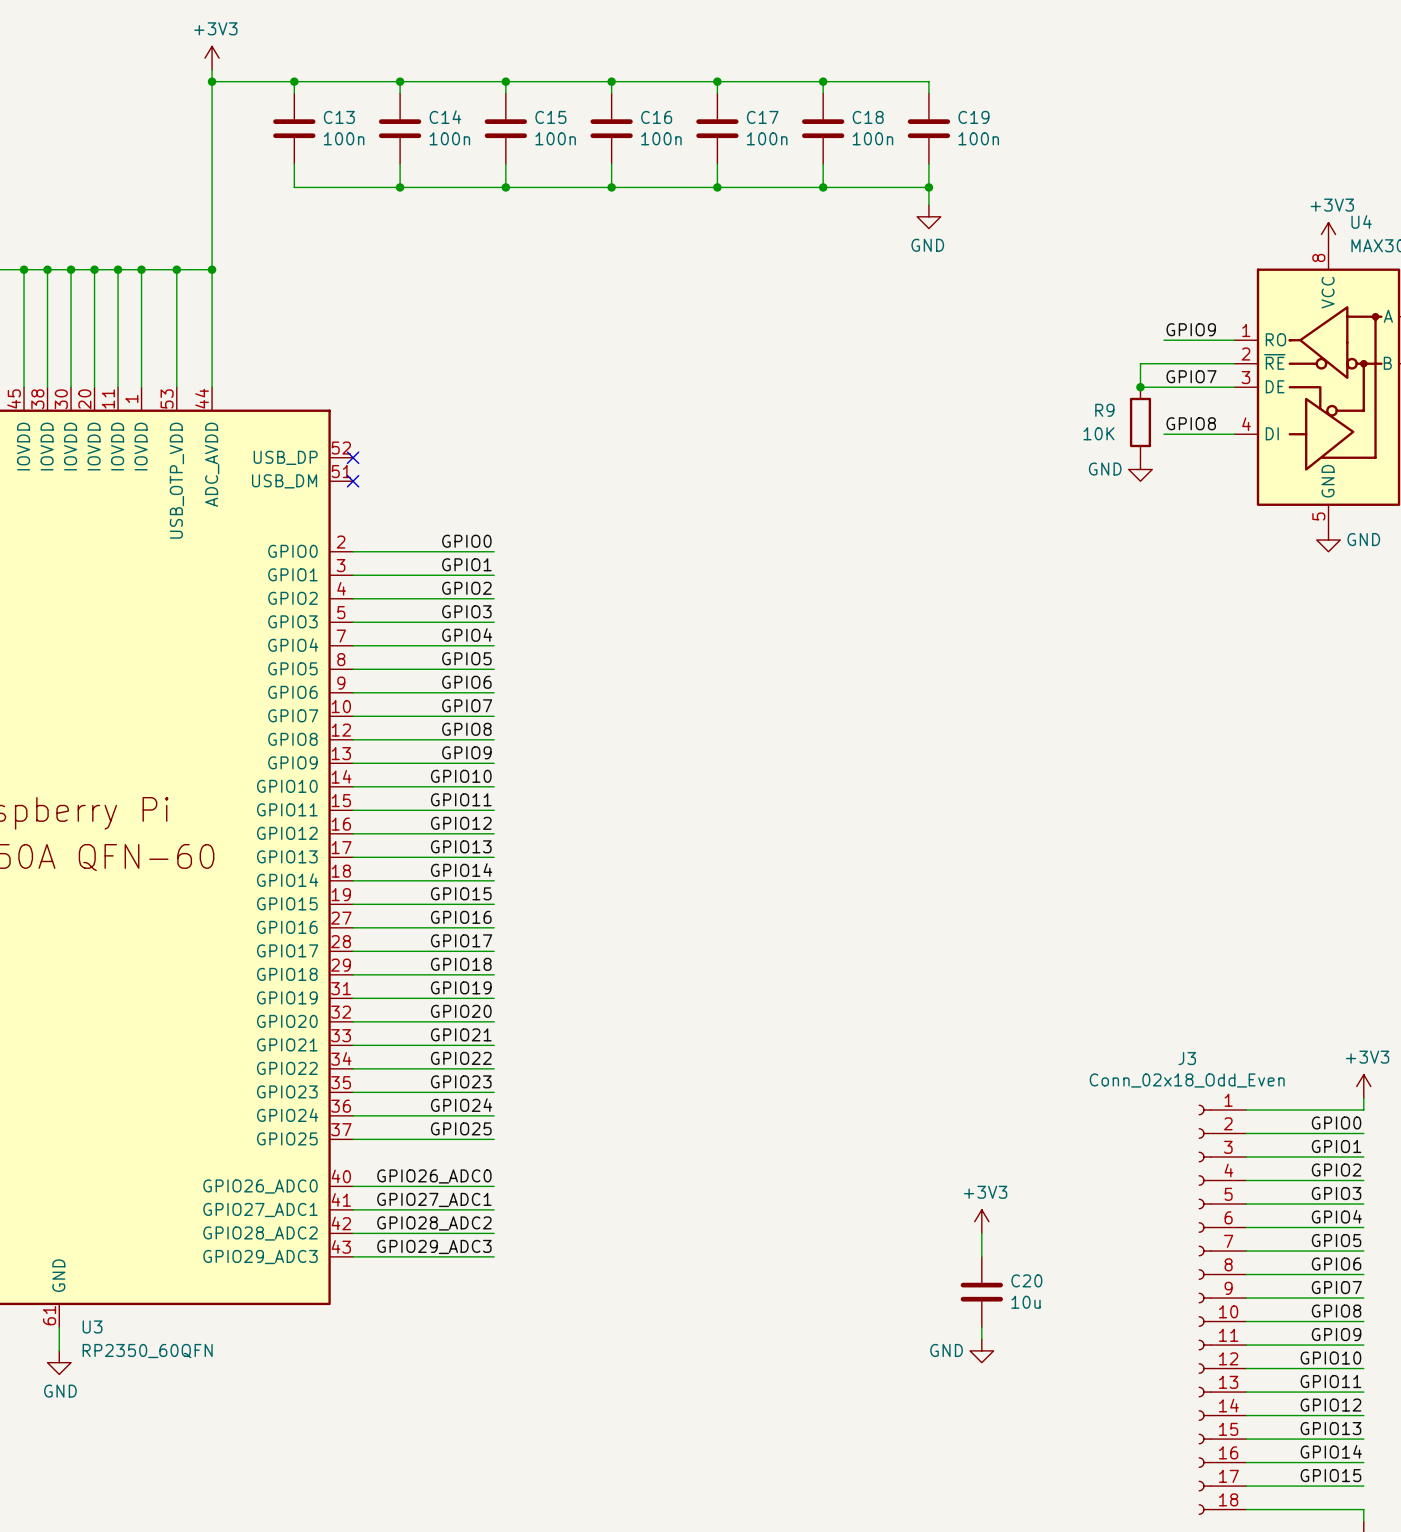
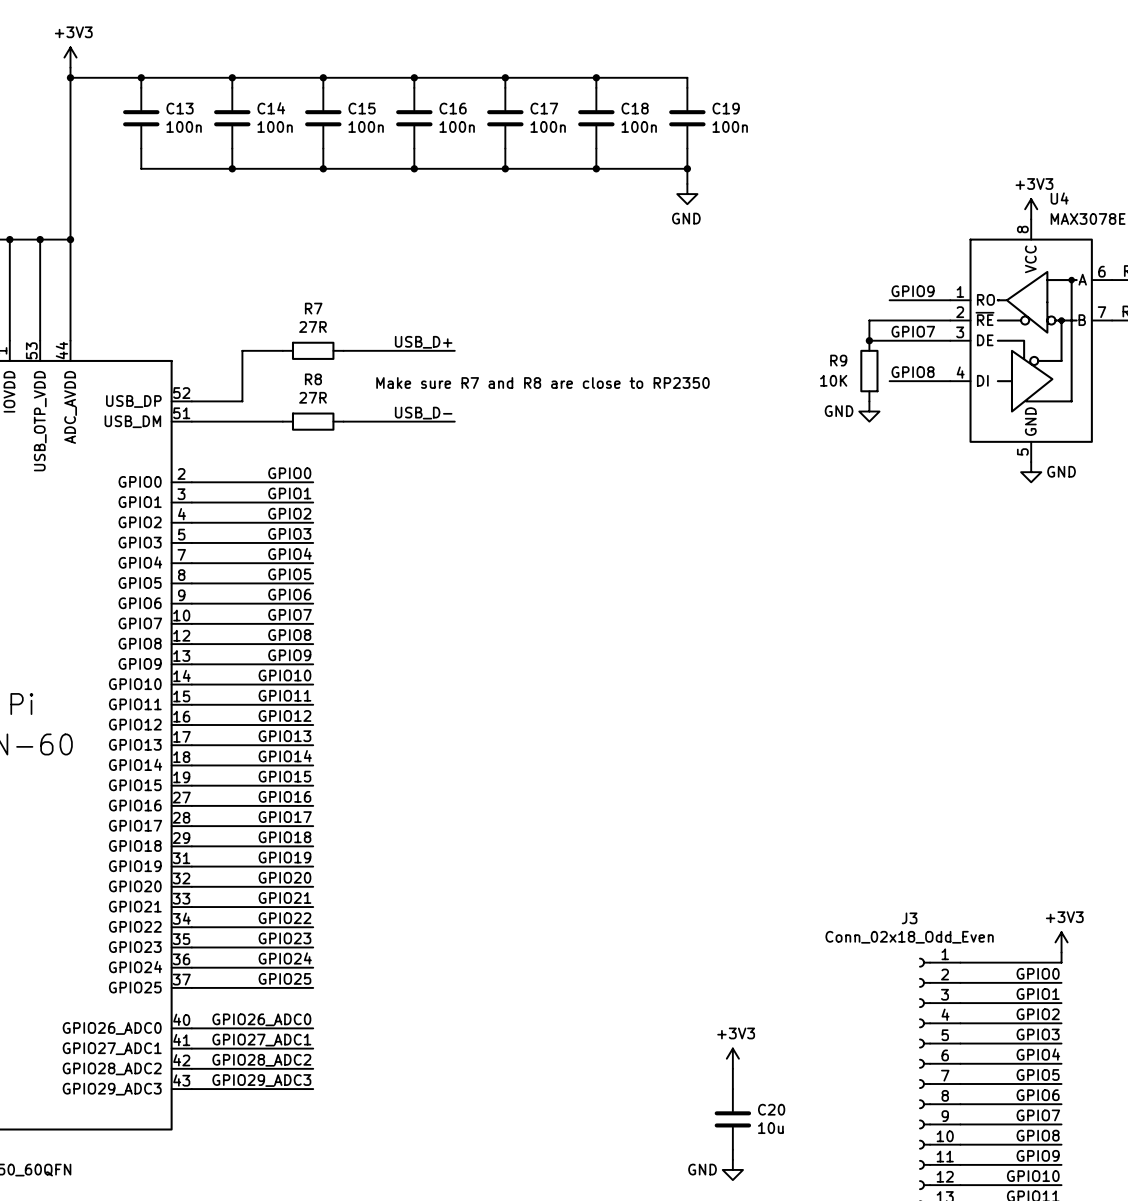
label: none -> USB_D+ (423, 342)
wire: none -> (282, 350) (242, 350) (242, 401) (191, 401)
R7: none -> 27R (313, 350)
wire: none -> (343, 350) (454, 350)
text: none -> Make sure R7 and R8 are close to RP2350 (542, 383)
no-connect mark: (353, 457) -> none
label: none -> USB_D- (423, 413)
wire: none -> (191, 421) (282, 421)
no-connect mark: (353, 481) -> none
R8: none -> 27R (313, 421)
wire: none -> (343, 421) (454, 421)

